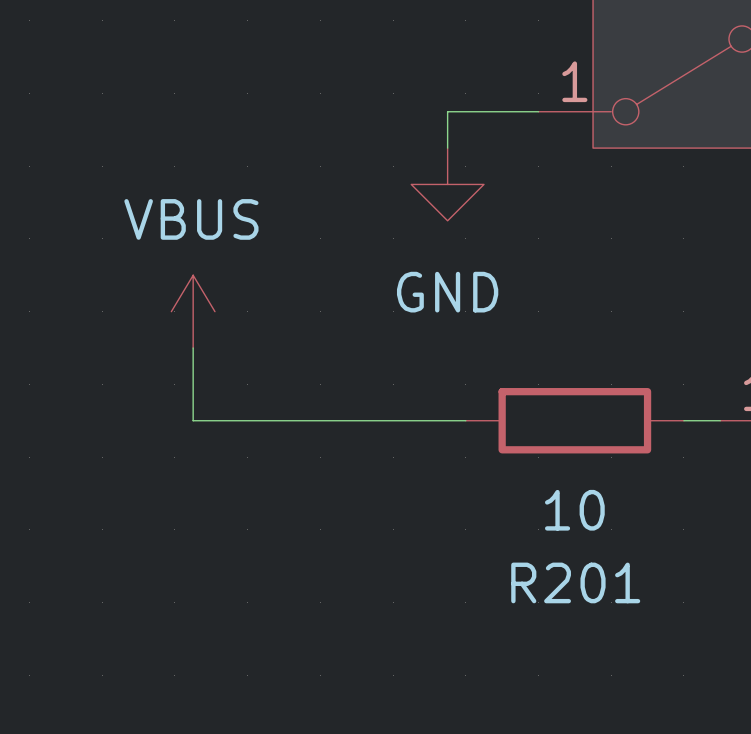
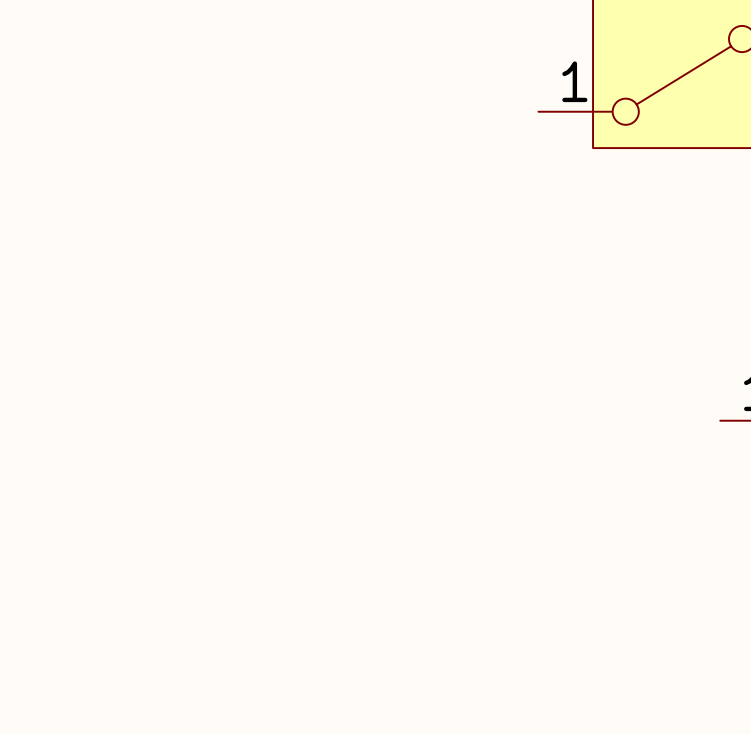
wire: (538, 111) (447, 111) (447, 148) -> none
power symbol: GND (447, 184) -> none
power symbol: VBUS (193, 311) -> none
wire: (193, 348) (193, 420) (465, 420) -> none
R201: 10 (574, 420) -> none
wire: (683, 420) (720, 420) -> none

